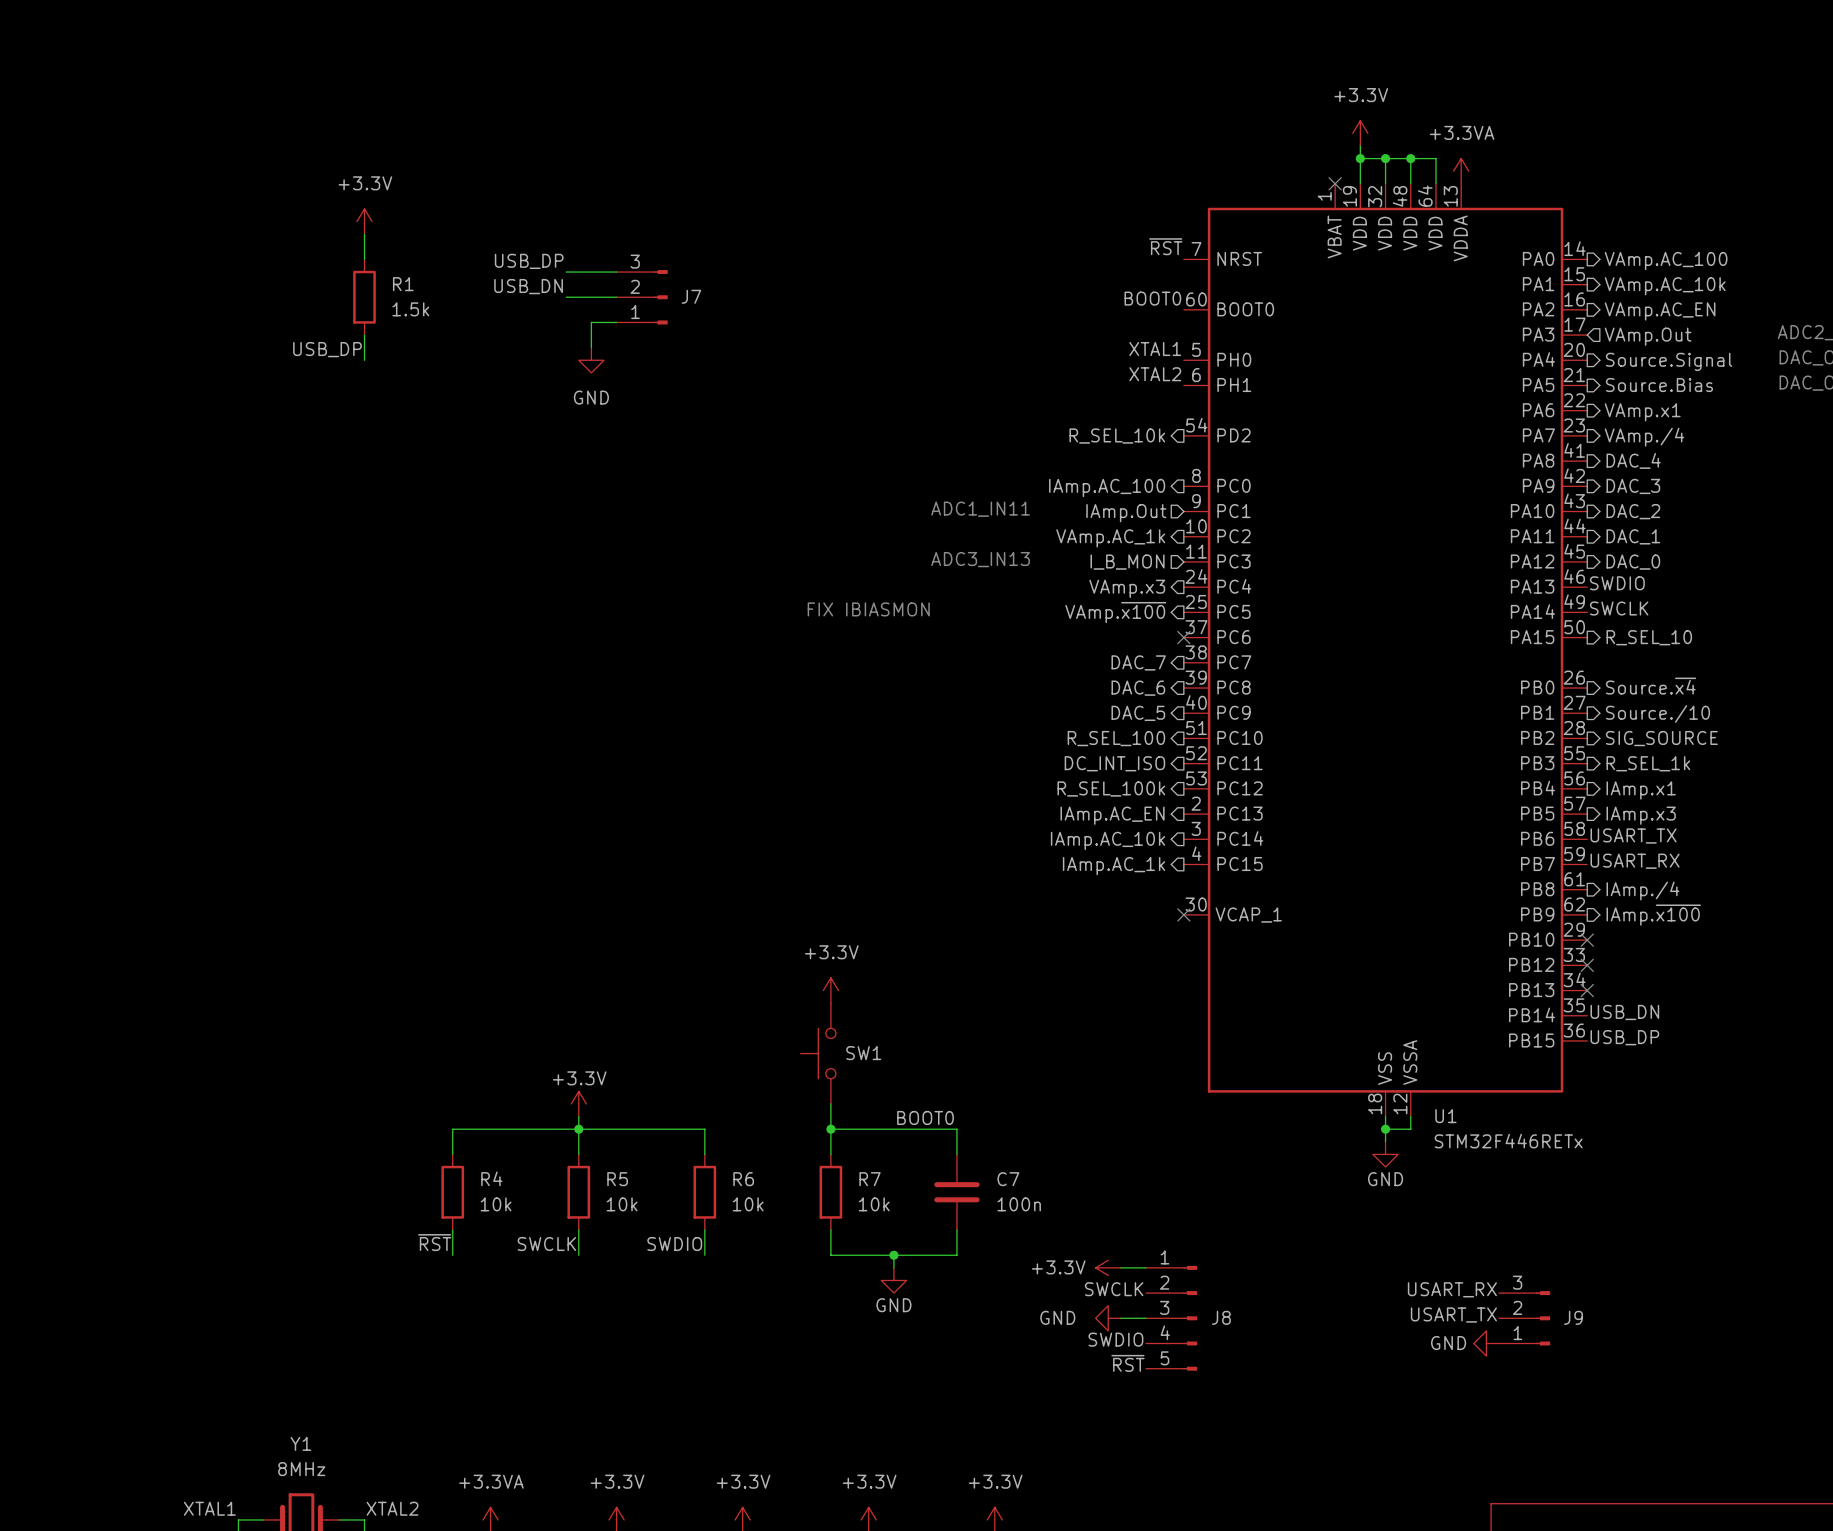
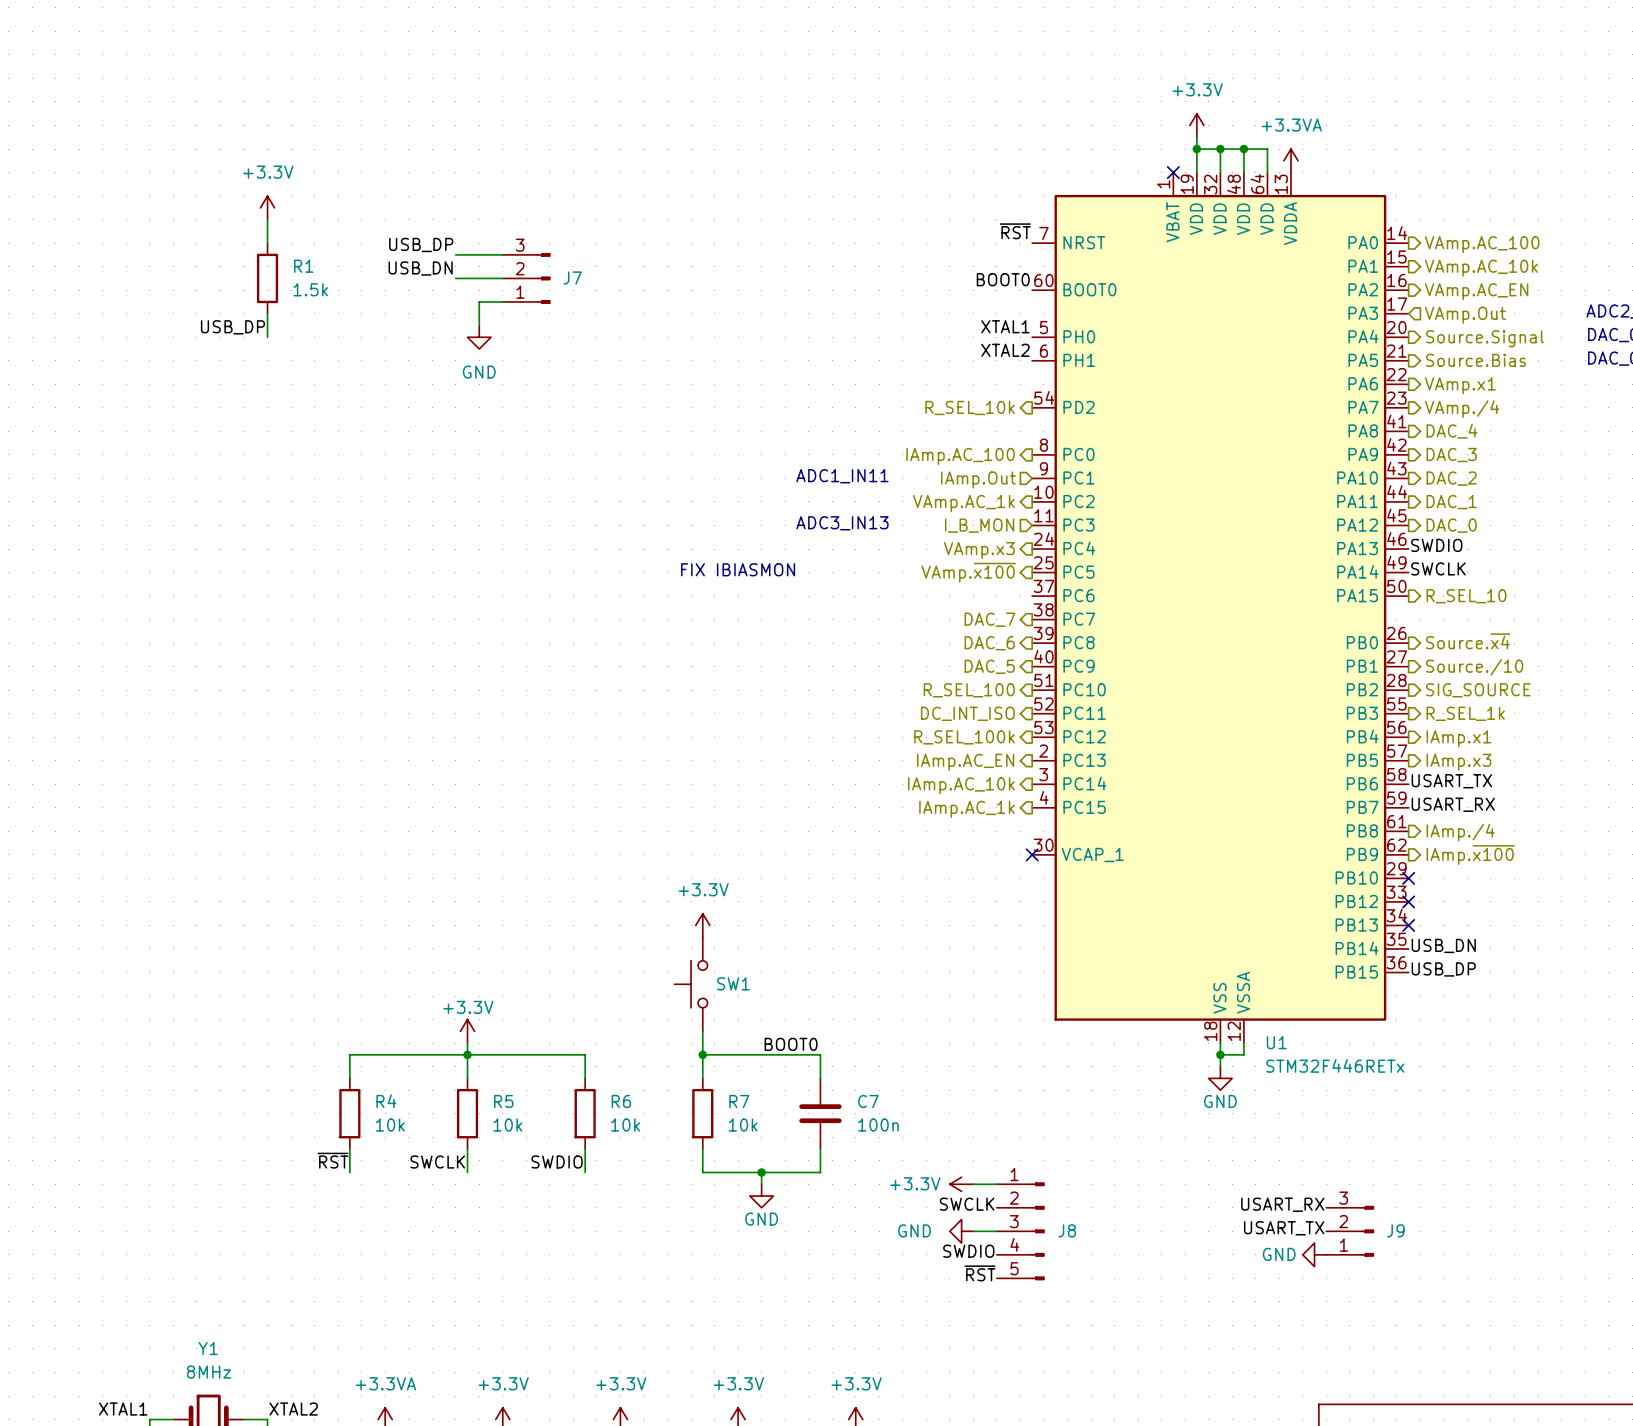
no-connect mark: (1183, 637) -> none

